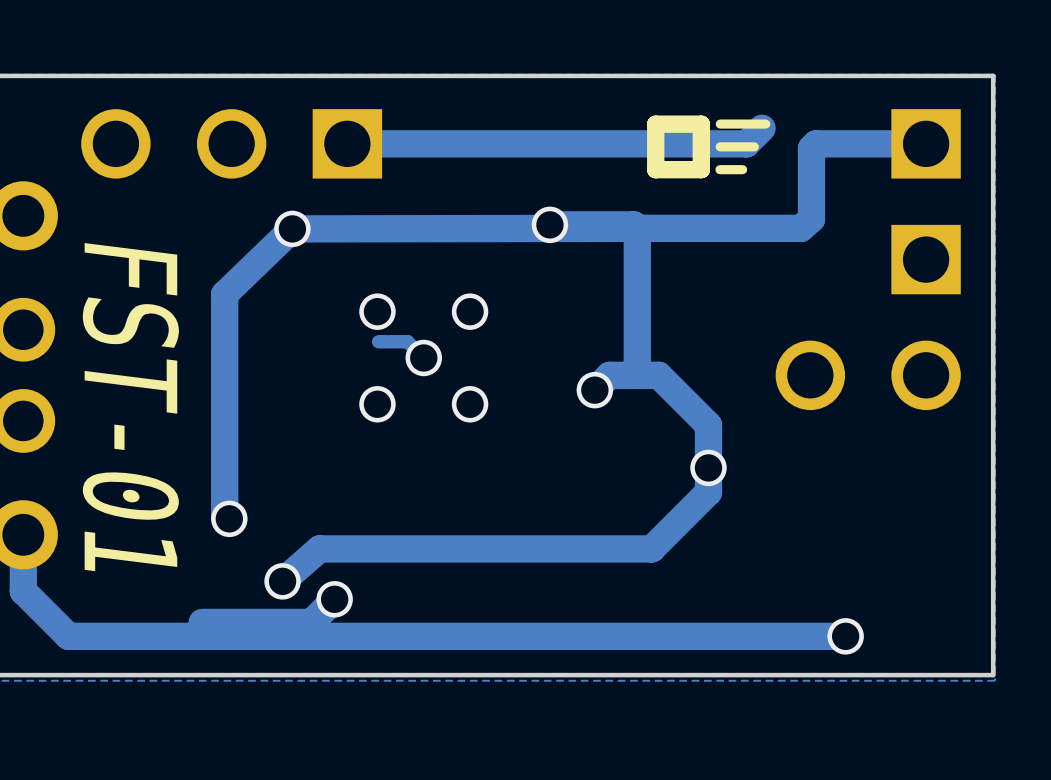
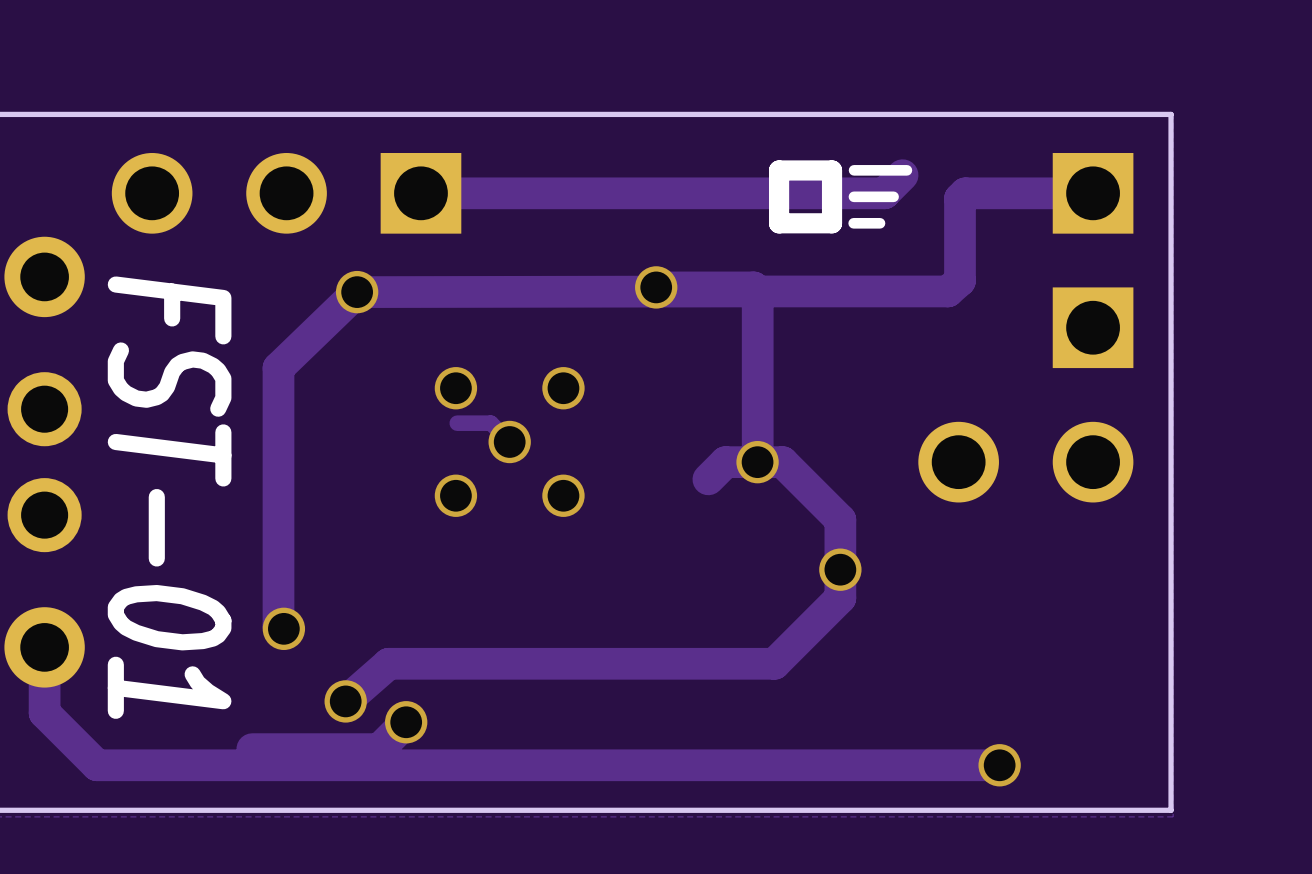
via position: (594, 390) -> (757, 462)

